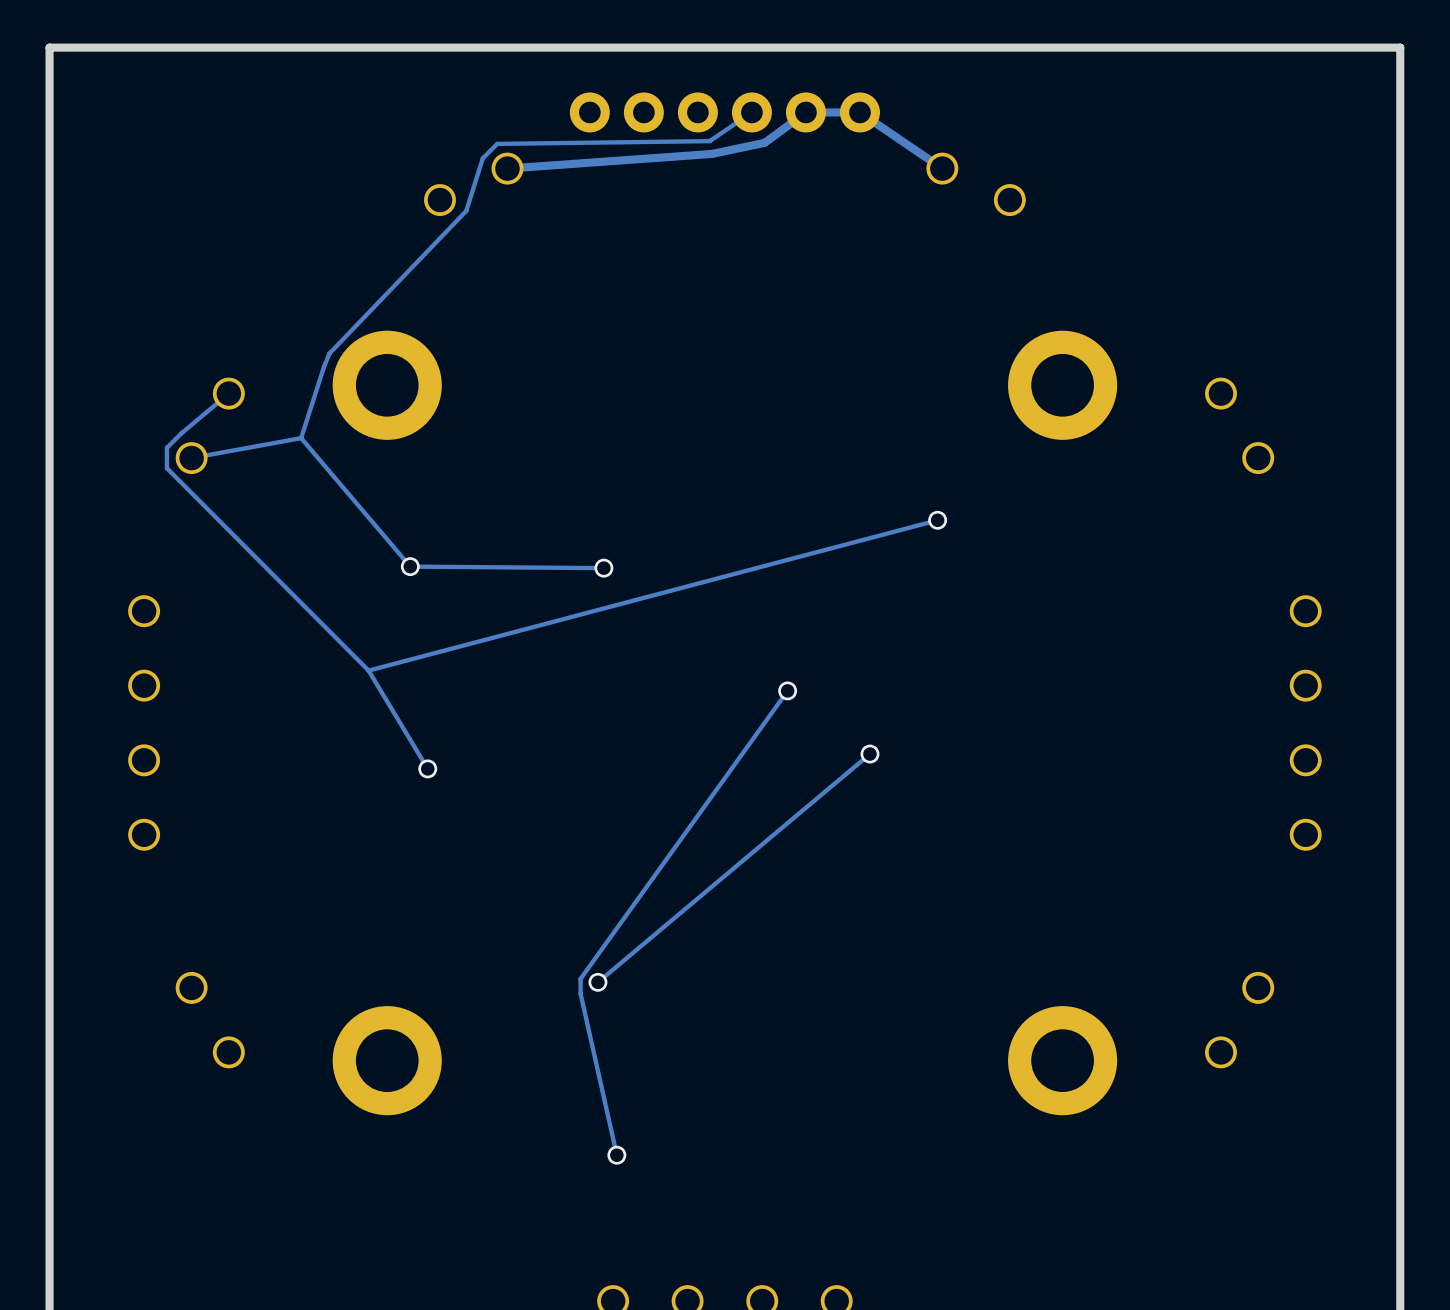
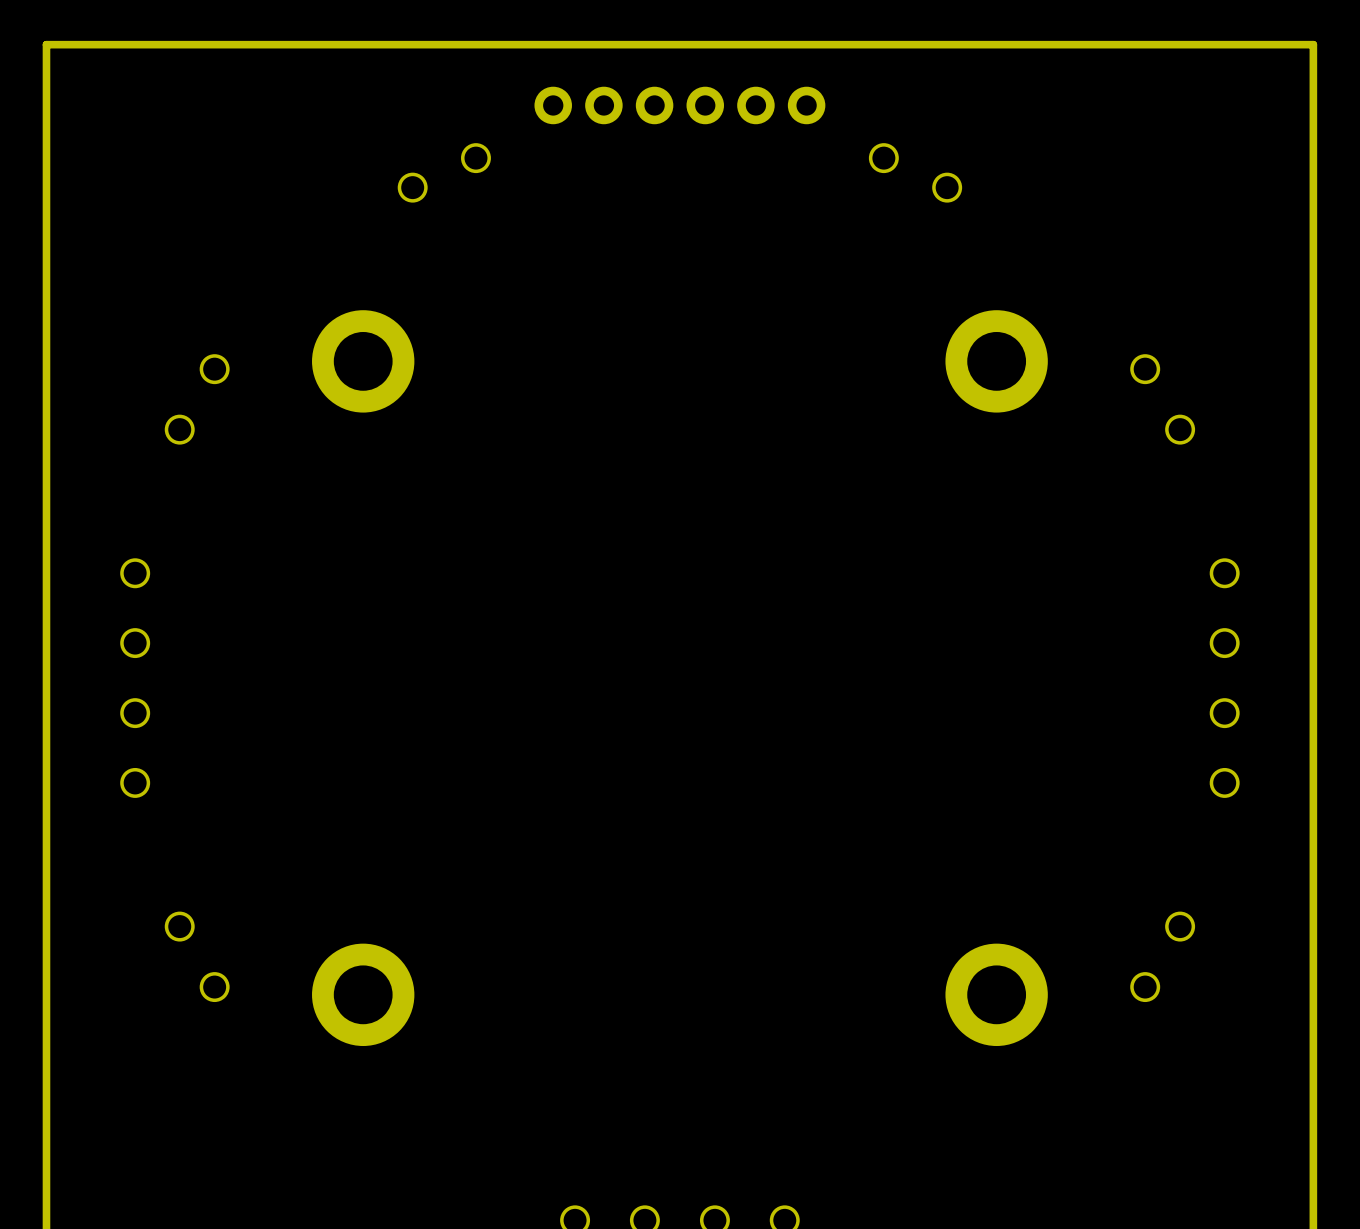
track: (751, 112) (709, 141) (497, 143) (482, 158) (466, 210) (329, 353) (301, 438) -> none
track: (942, 168) (859, 112) (805, 112) (765, 142) (711, 153) (507, 168) -> none
track: (228, 393) (166, 447) (166, 468) (368, 670) -> none
track: (301, 438) (191, 458) -> none
track: (301, 438) (410, 566) (603, 568) -> none
track: (937, 520) (368, 670) -> none
via: (937, 520) -> none
via: (410, 566) -> none
via: (603, 568) -> none
track: (368, 670) (427, 768) -> none
track: (787, 690) (580, 978) (580, 993) (616, 1155) -> none
via: (787, 690) -> none
track: (869, 754) (597, 982) -> none
via: (869, 754) -> none
via: (427, 768) -> none
via: (597, 982) -> none
via: (616, 1155) -> none

